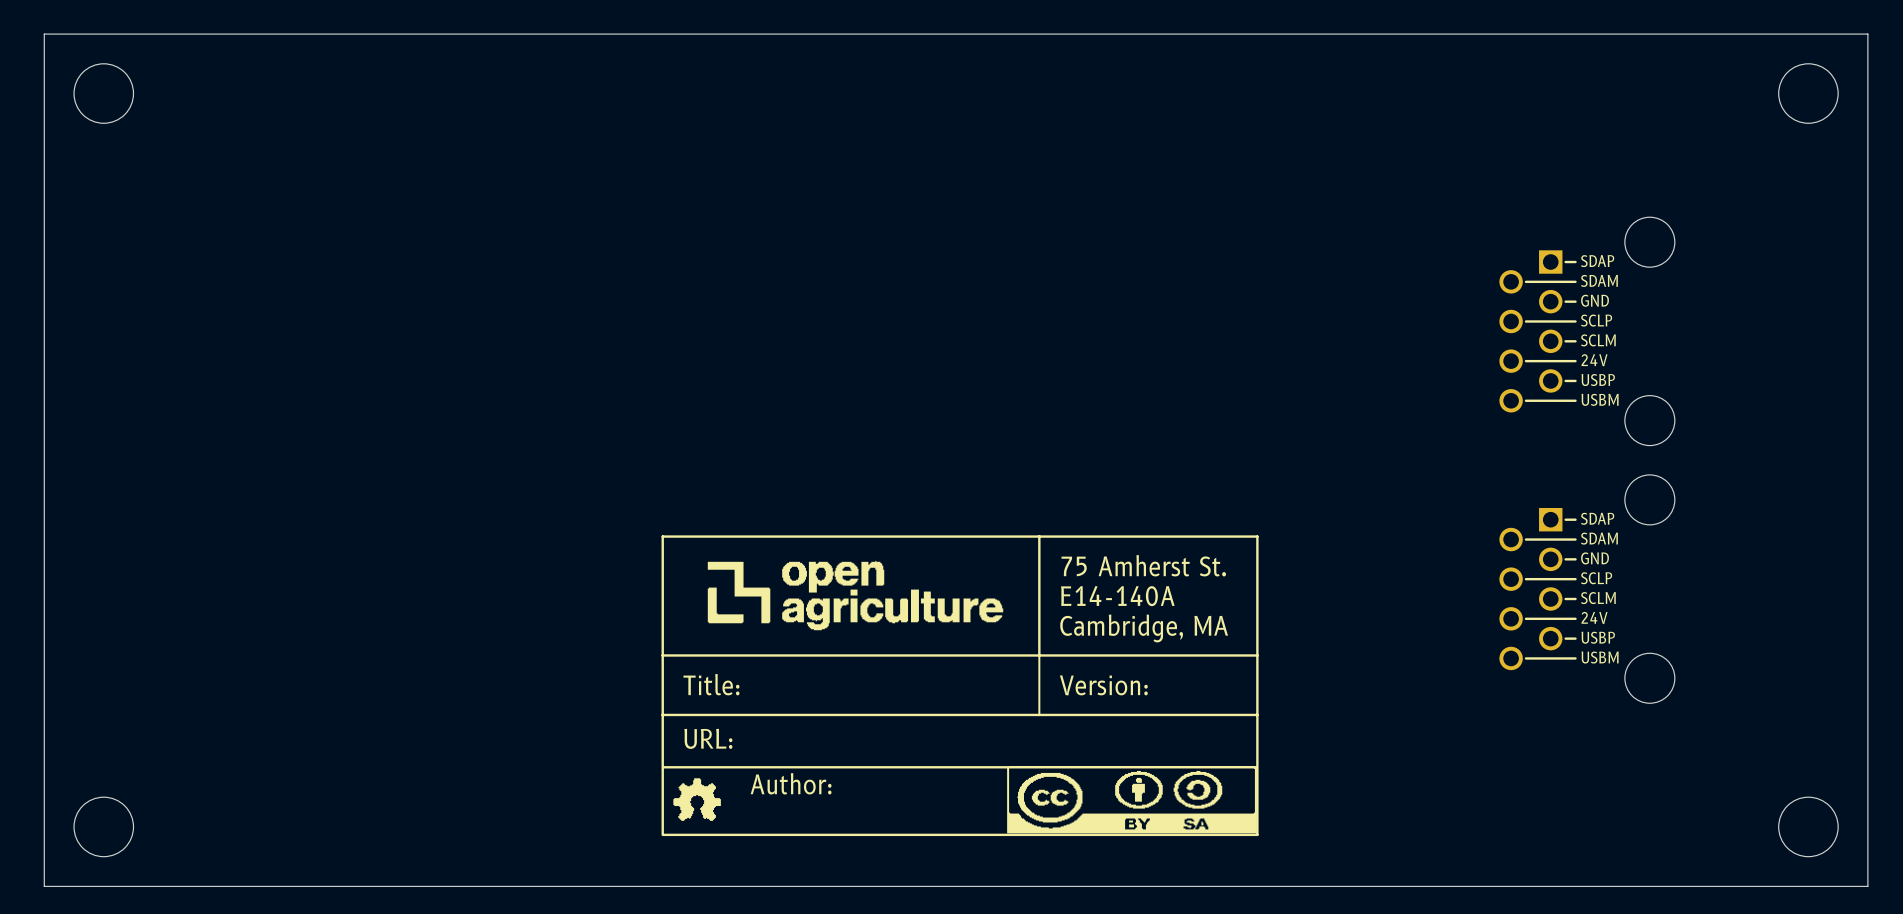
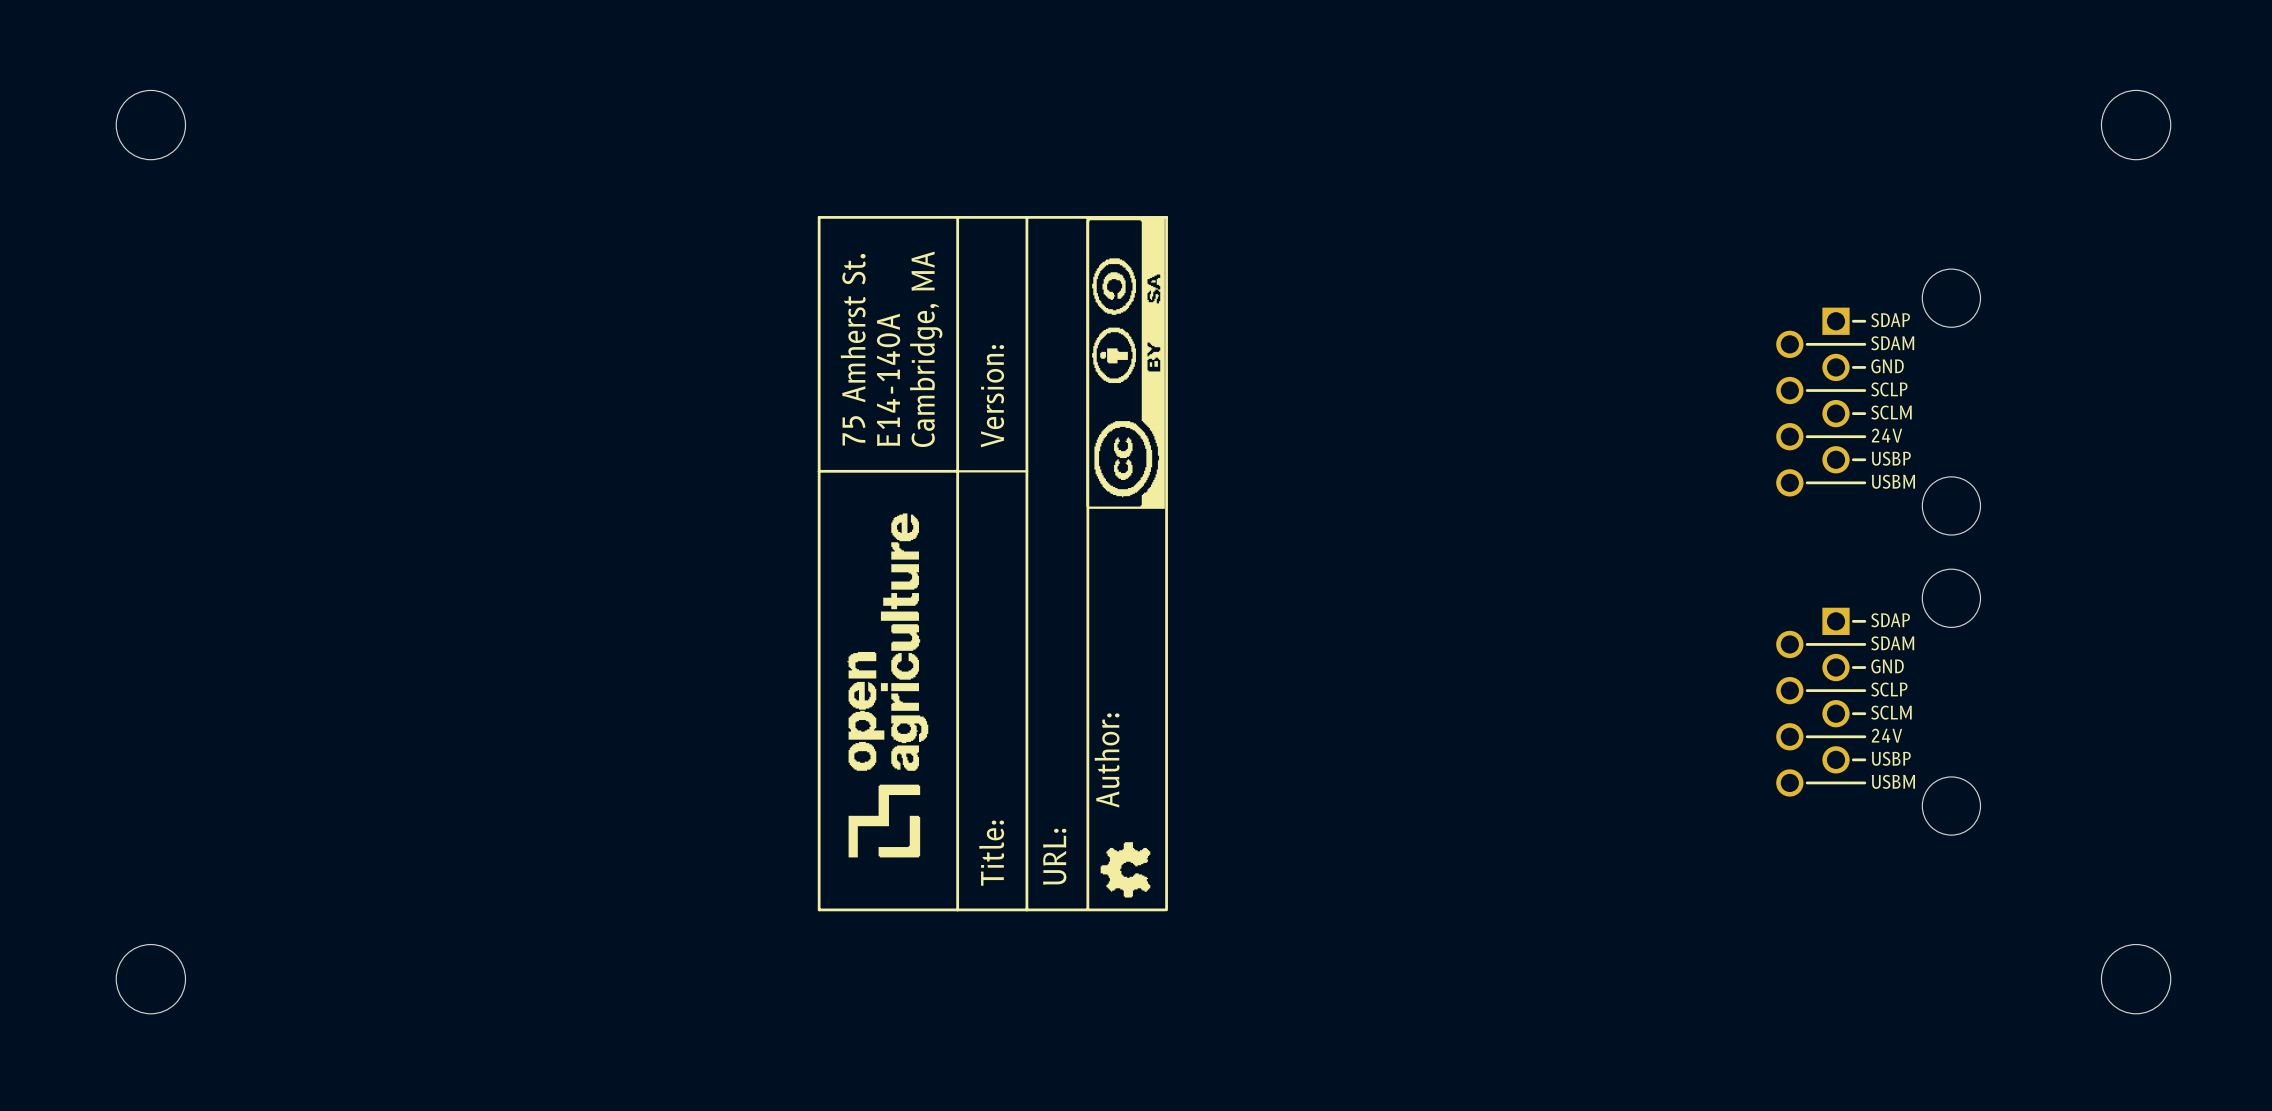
board edge: (1867, 34) (44, 34) (44, 886) (1867, 886) (1867, 34) -> none
drawing: none -> [817, 216, 1168, 912]
drawing: [661, 535, 1259, 837] -> none

